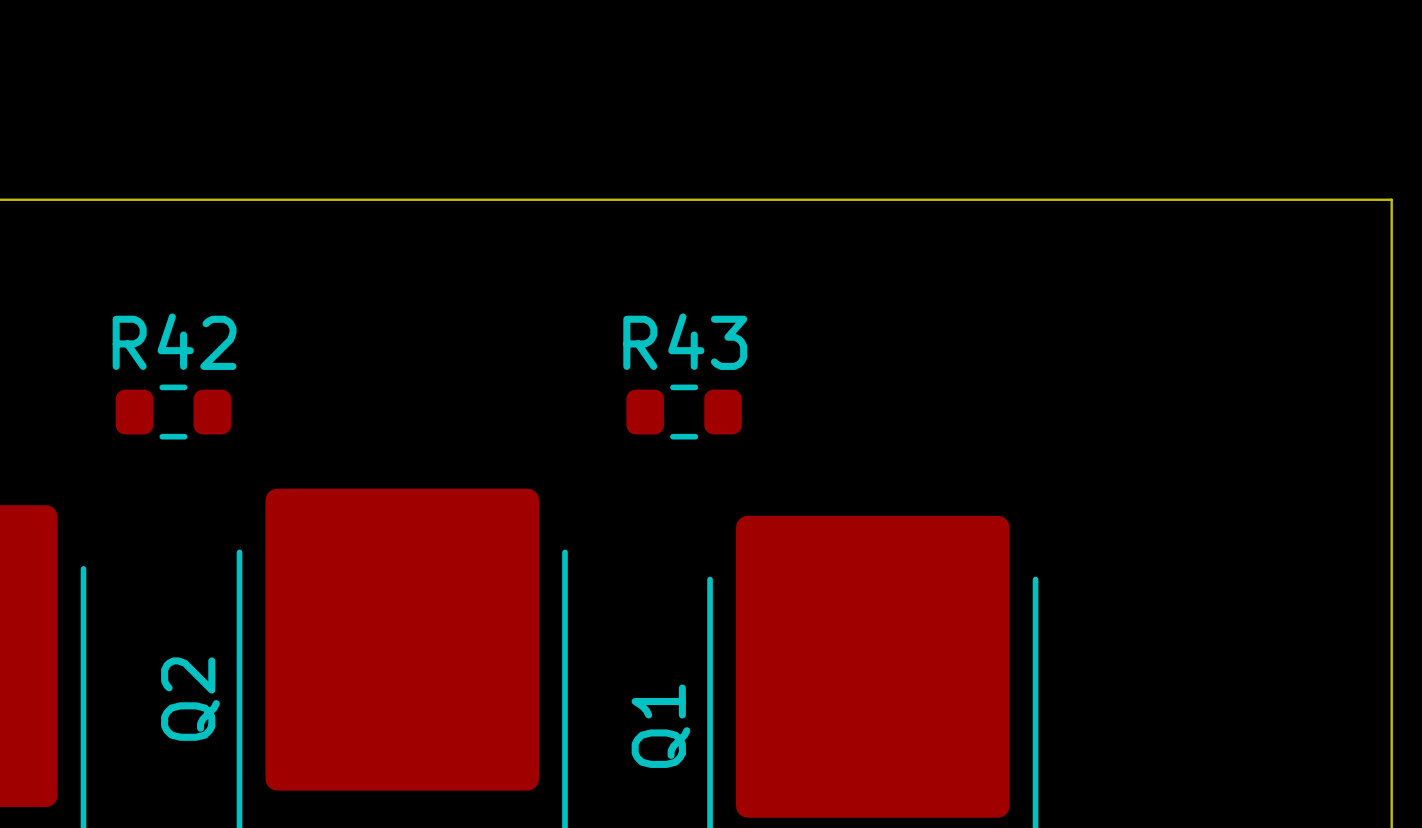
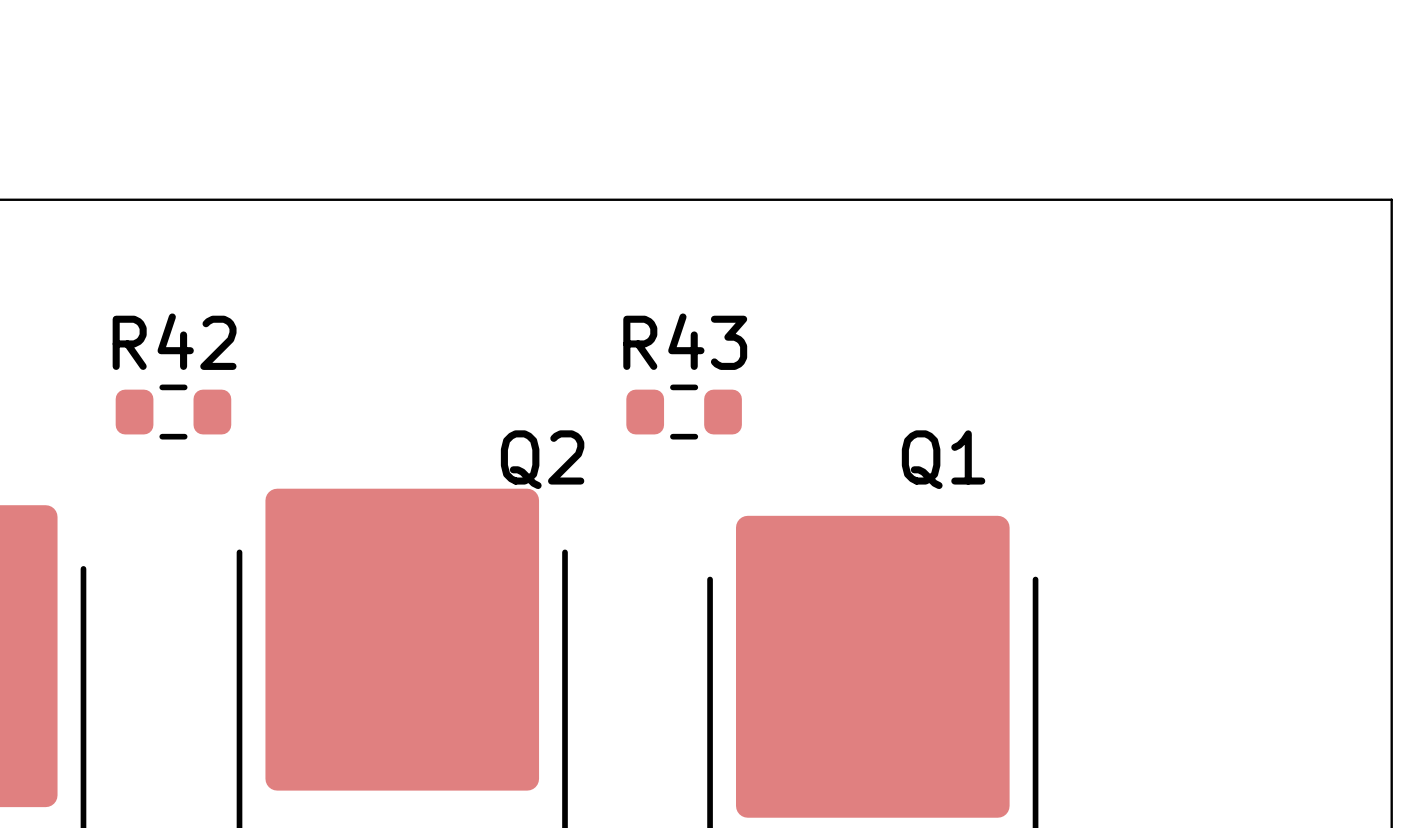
Q2 name rotation: 0° (190, 699) -> 90° clockwise (542, 459)
Q2 name position: Q2 (190, 699) -> Q2 (542, 459)
Q1 name rotation: 0° (661, 726) -> 90° clockwise (943, 459)
Q1 name position: Q1 (661, 726) -> Q1 (943, 459)

